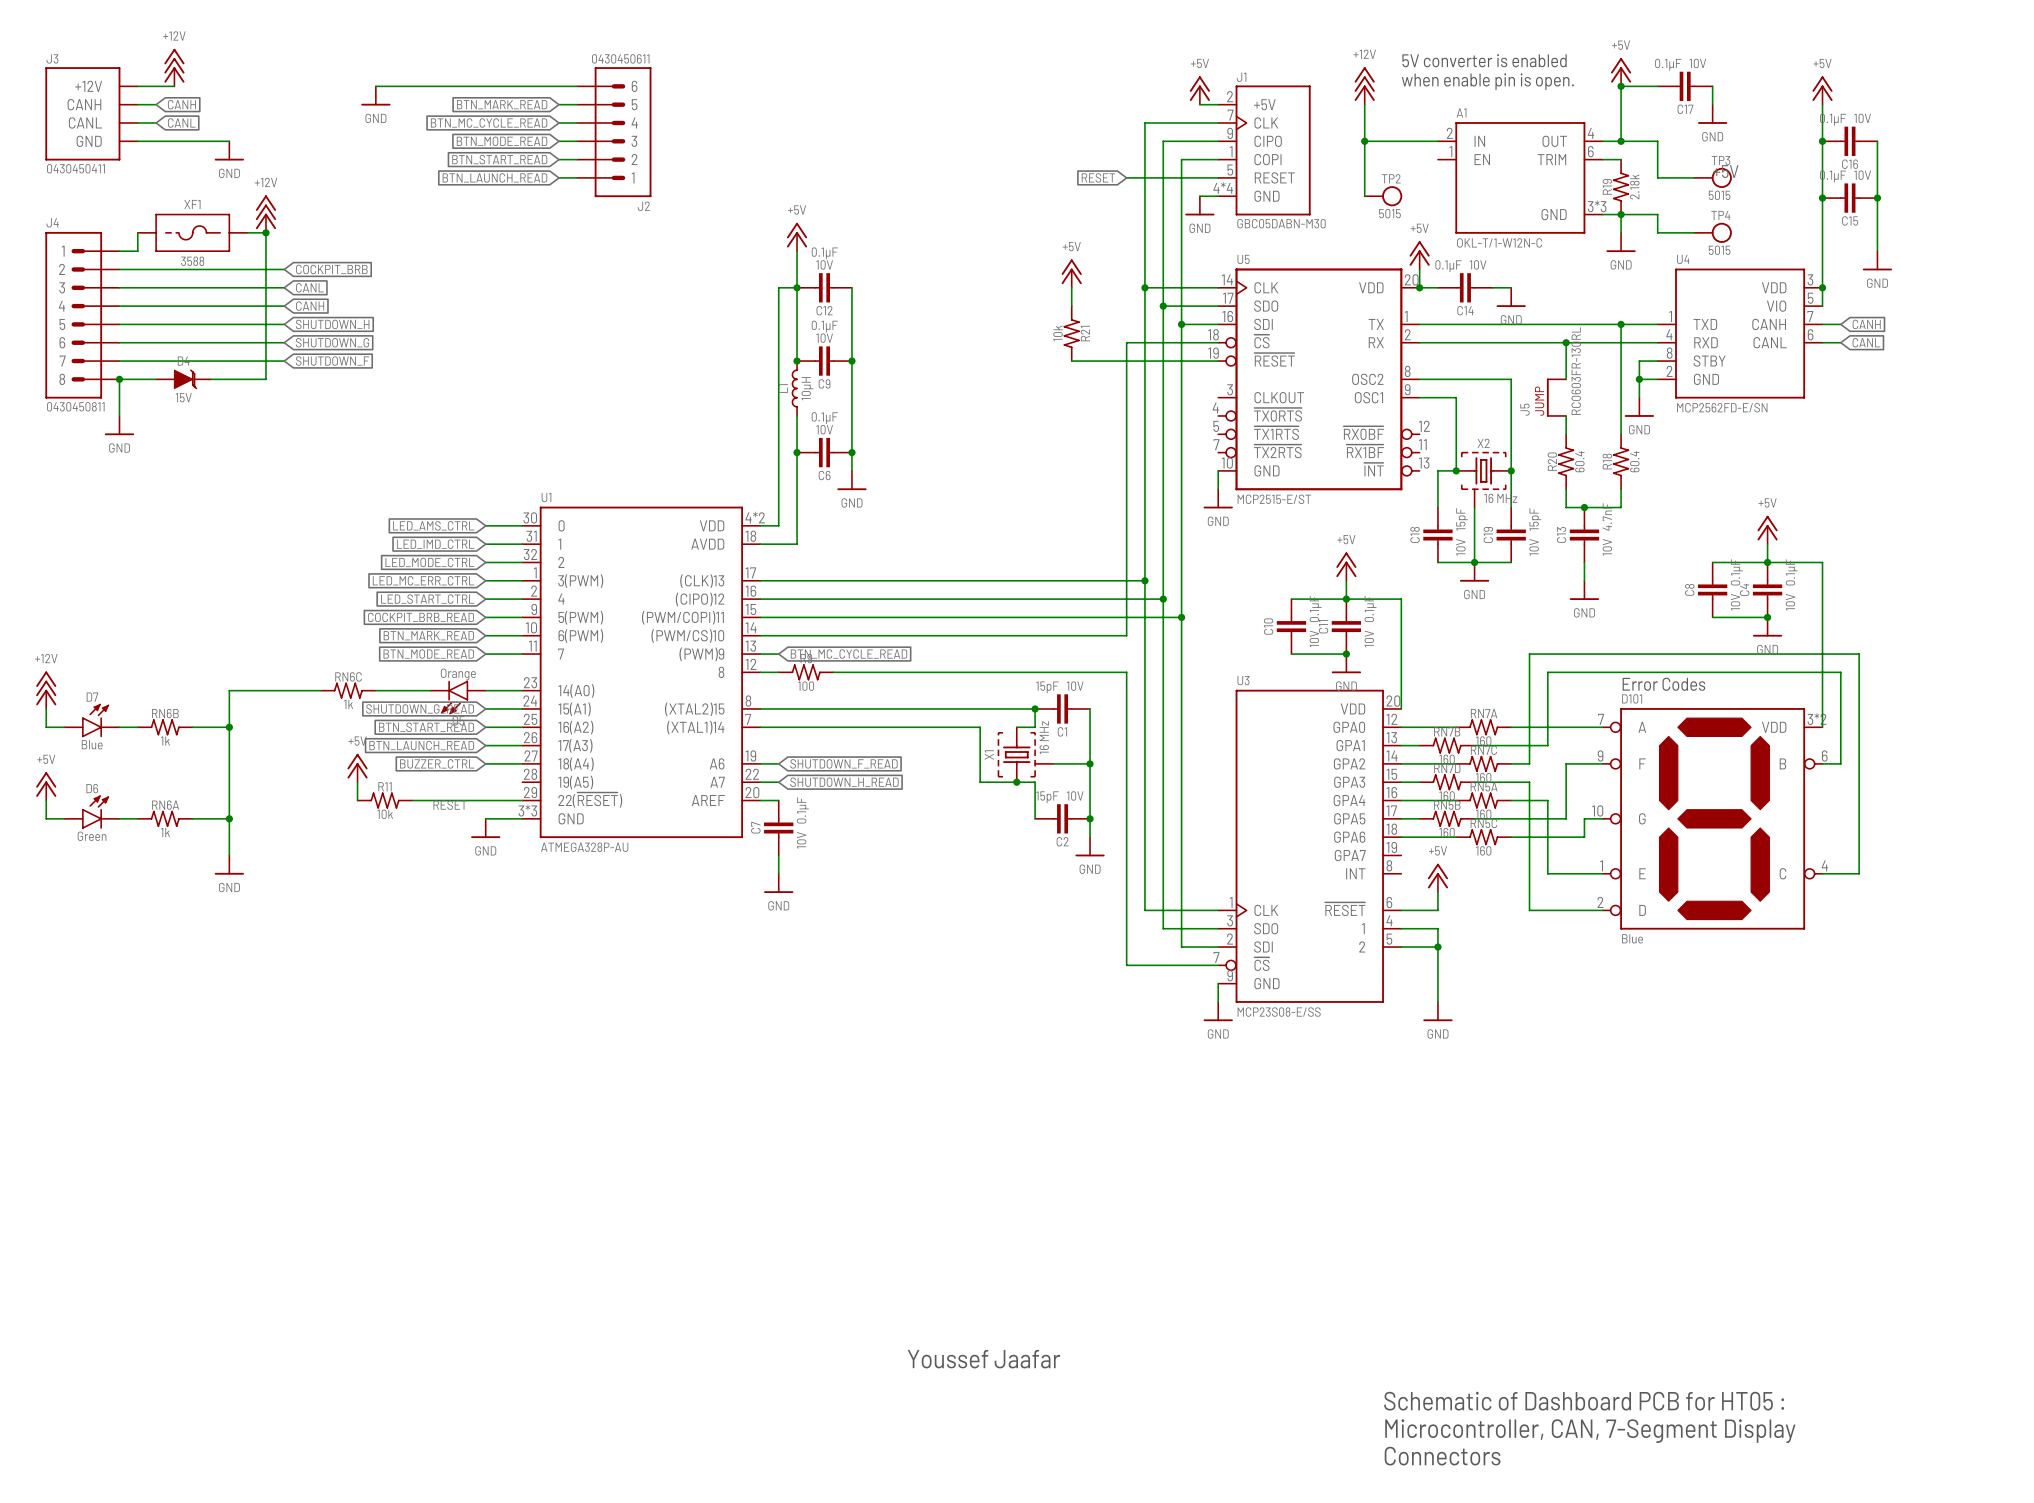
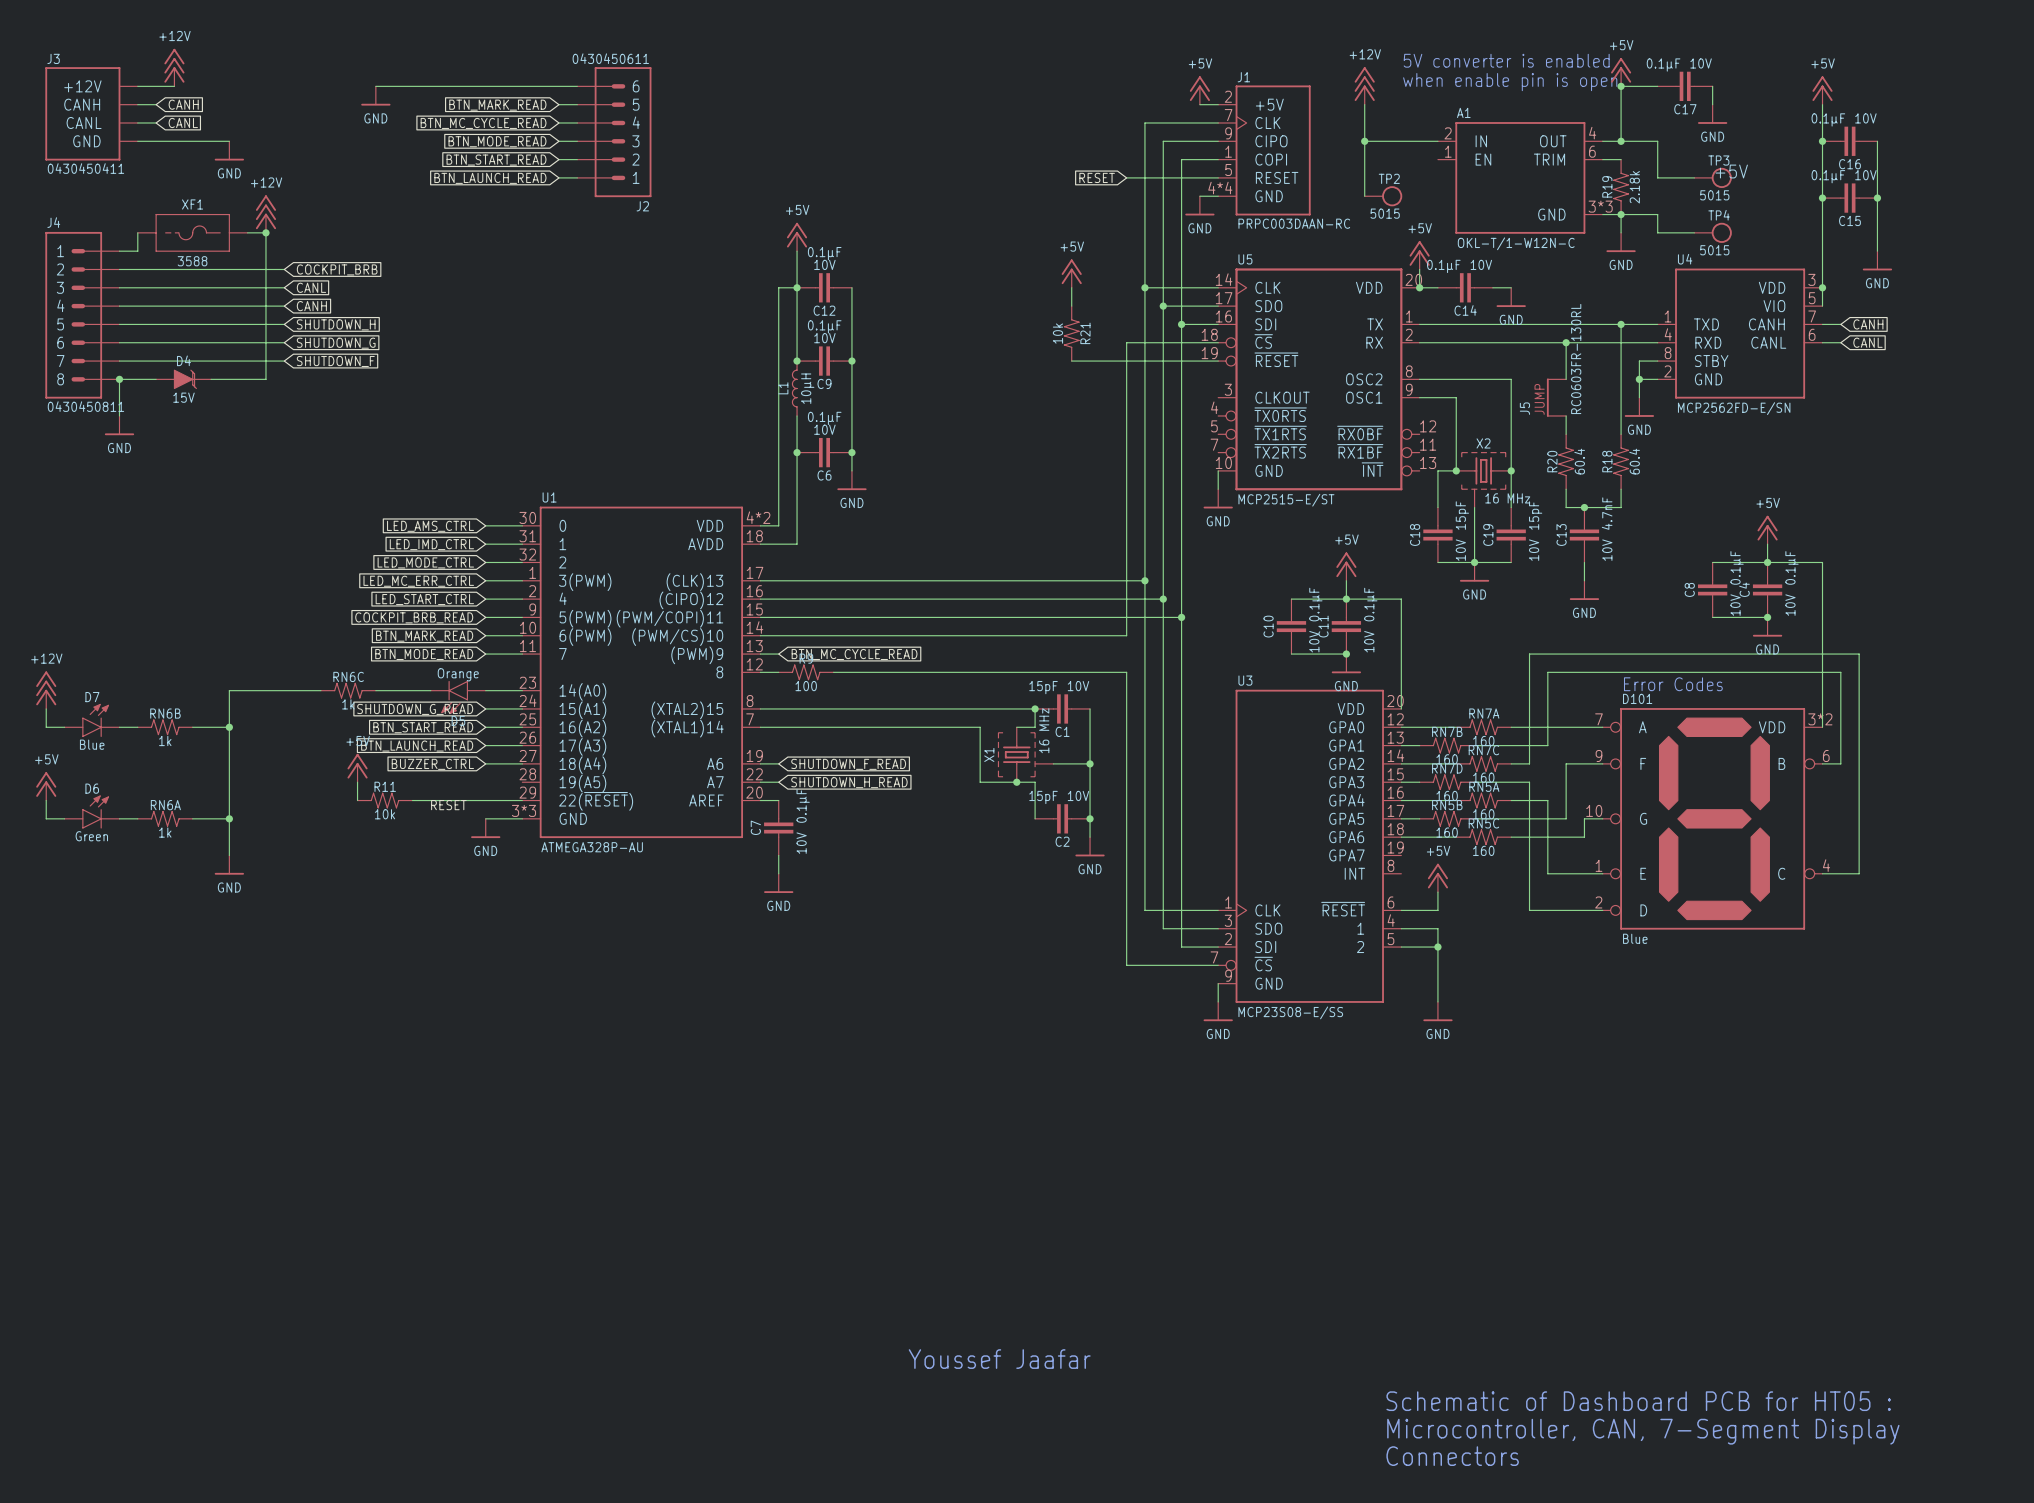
J1 text: GBC05DABN-M30 (1281, 223) -> PRPC003DAAN-RC (1294, 223)

